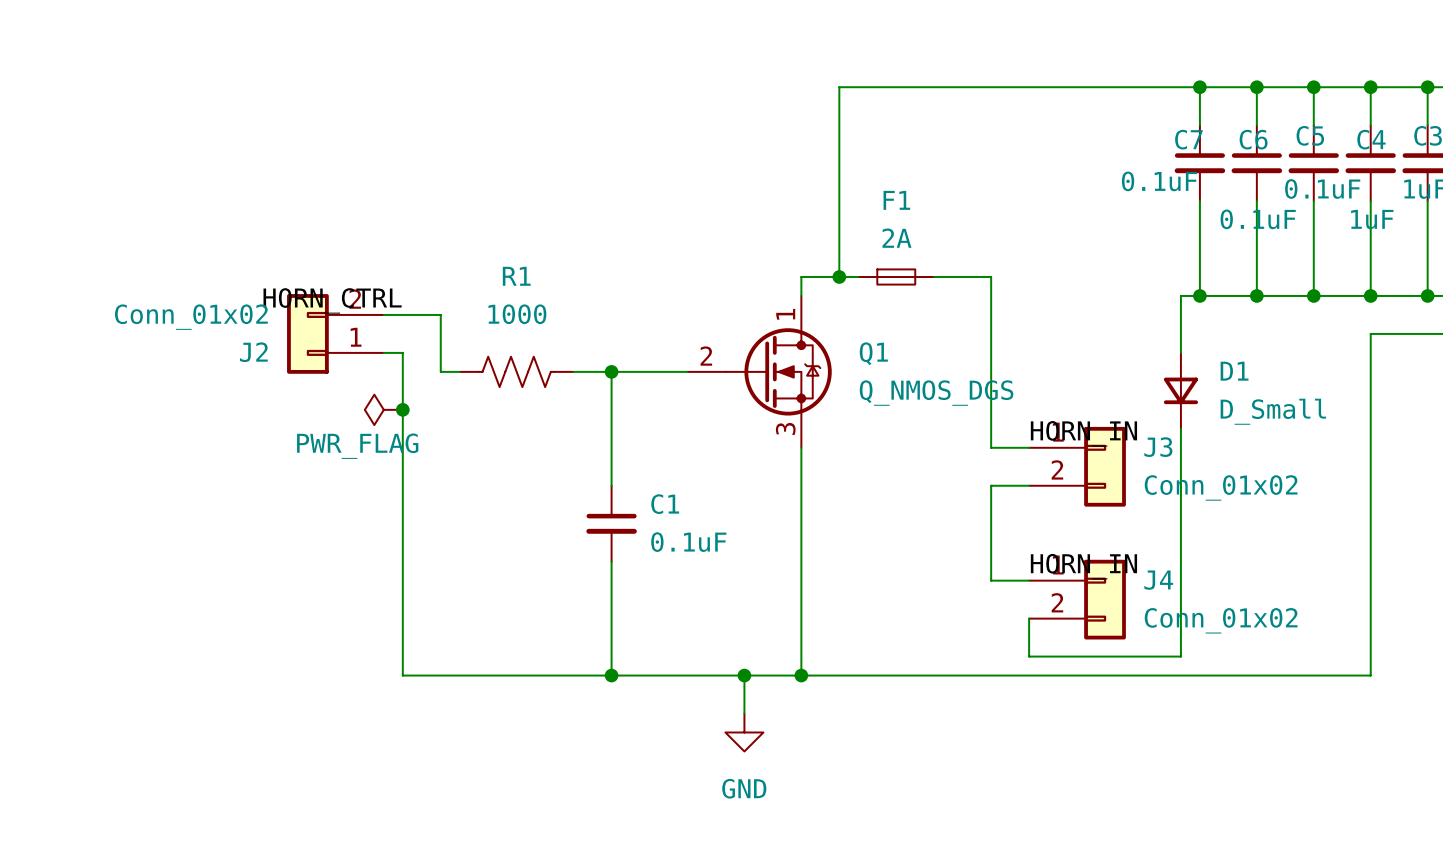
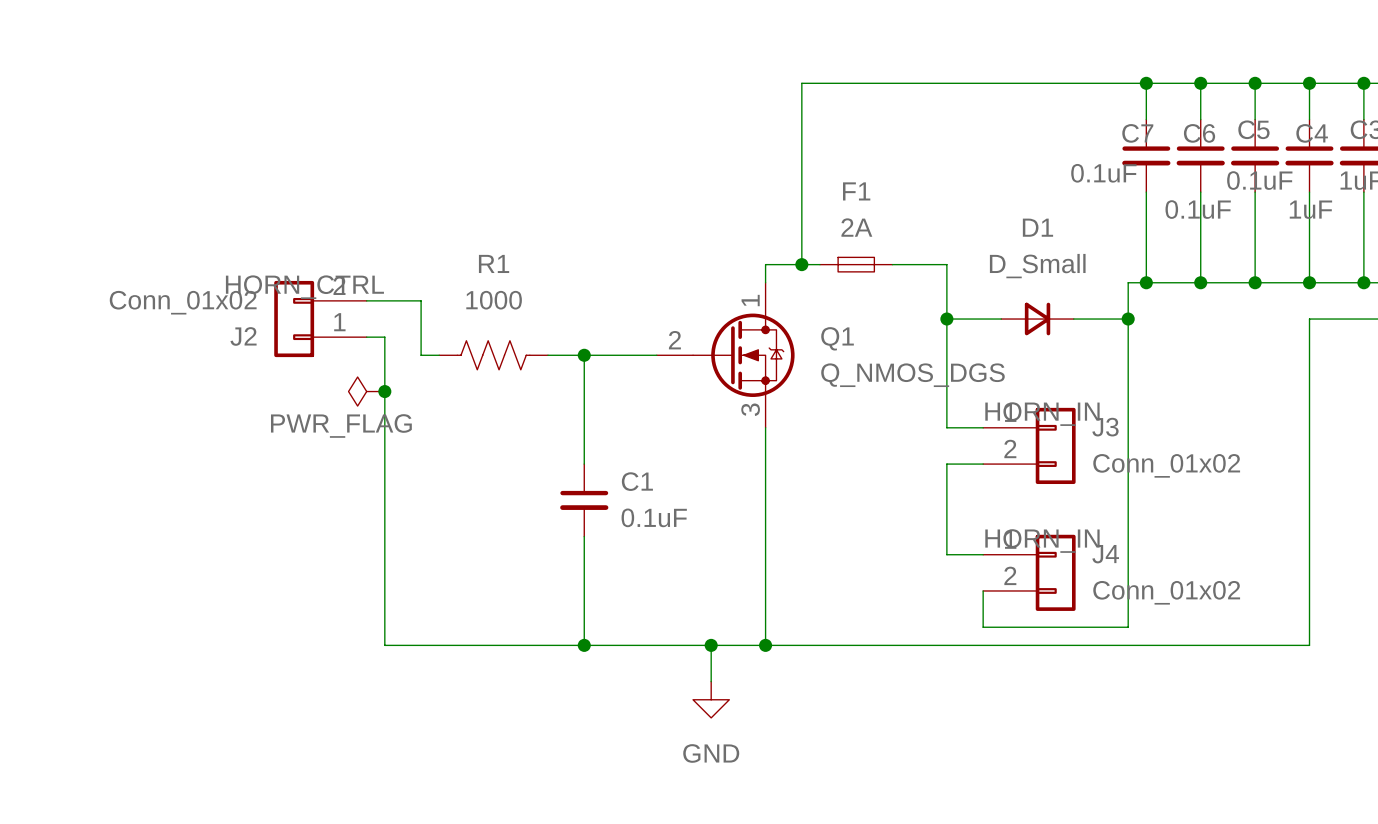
wire: none -> (946, 319) (1001, 319)
junction: none -> (946, 319)
wire: none -> (1073, 319) (1128, 319)
junction: none -> (1128, 319)
D1 name position: D1 (1234, 371) -> D1 (1037, 227)
D1 rotation: 0° (1180, 390) -> 90° counterclockwise (1037, 319)
D1 position: (1180, 390) -> (1037, 319)
D1 value position: D_Small (1273, 411) -> D_Small (1037, 266)

